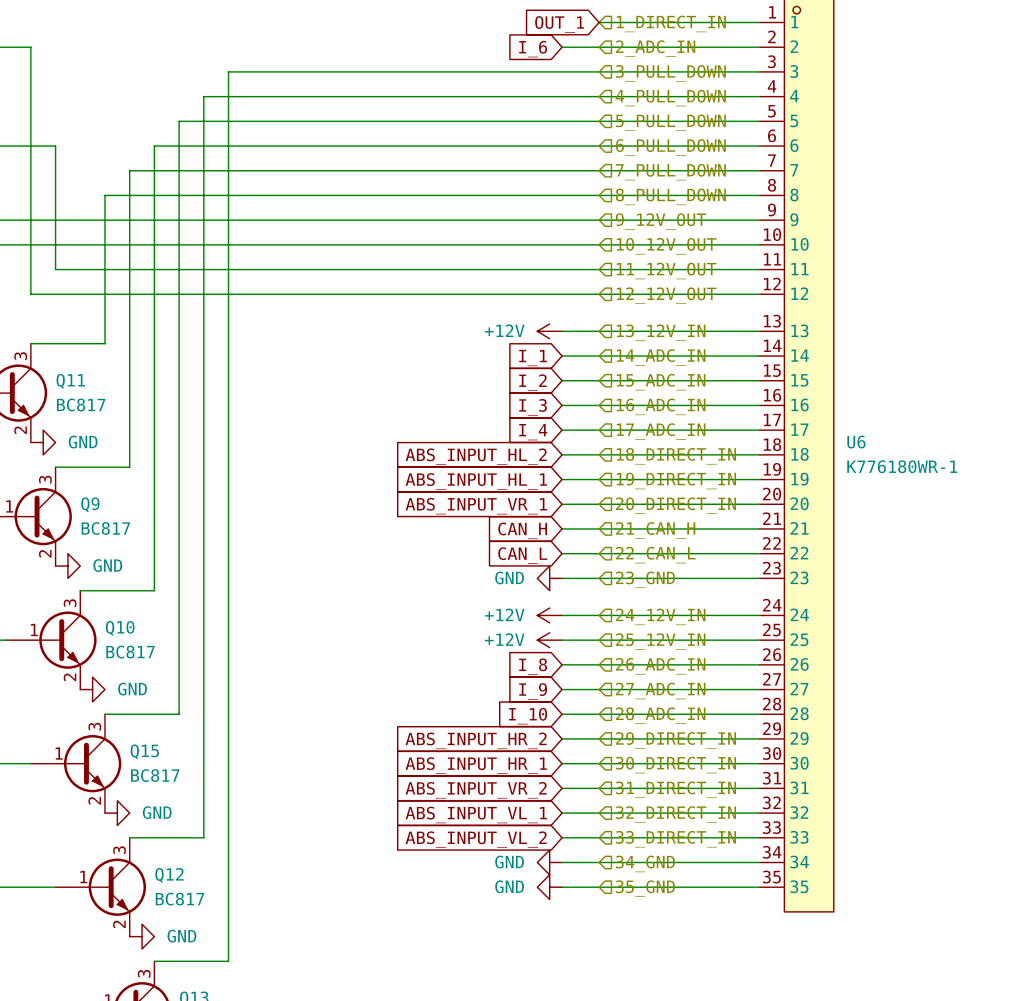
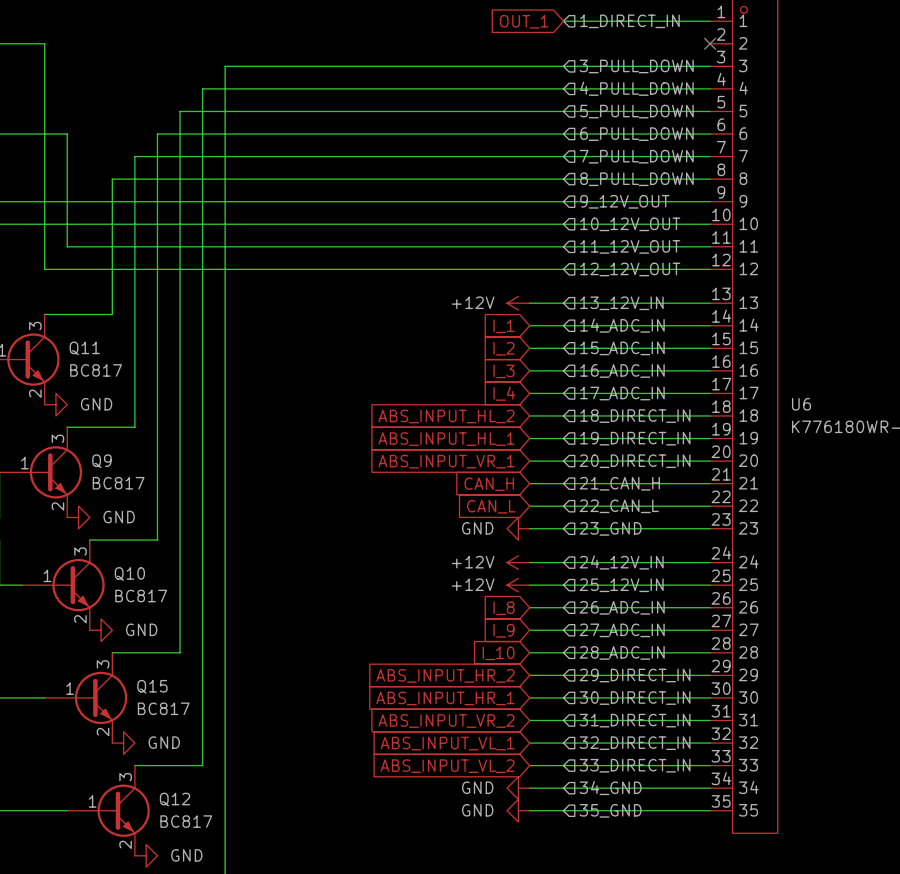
wire: (562, 47) (759, 47) -> none
no-connect mark: none -> (710, 43)
hierarchical label: 2_ADC_IN (655, 48) -> none
global label: I_6 (533, 49) -> none

